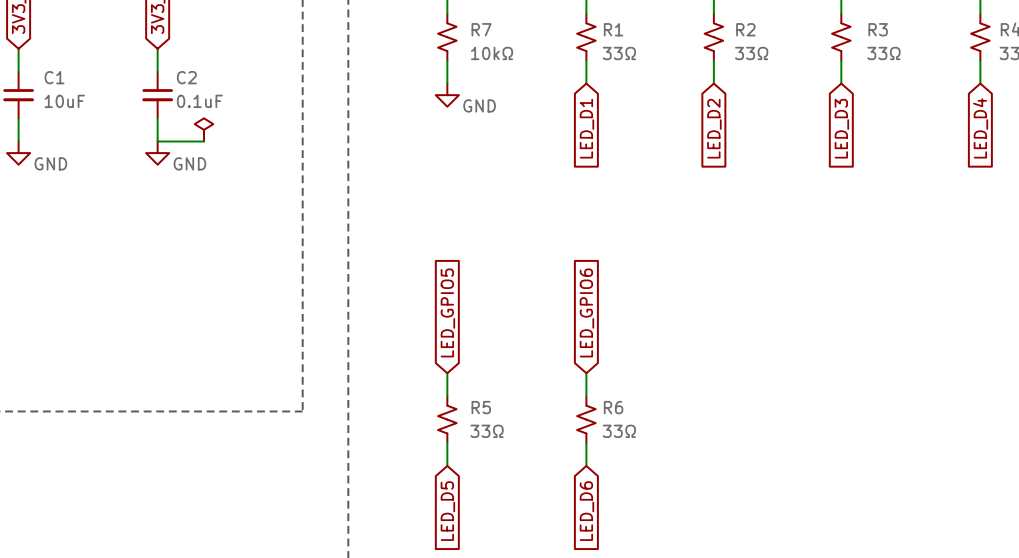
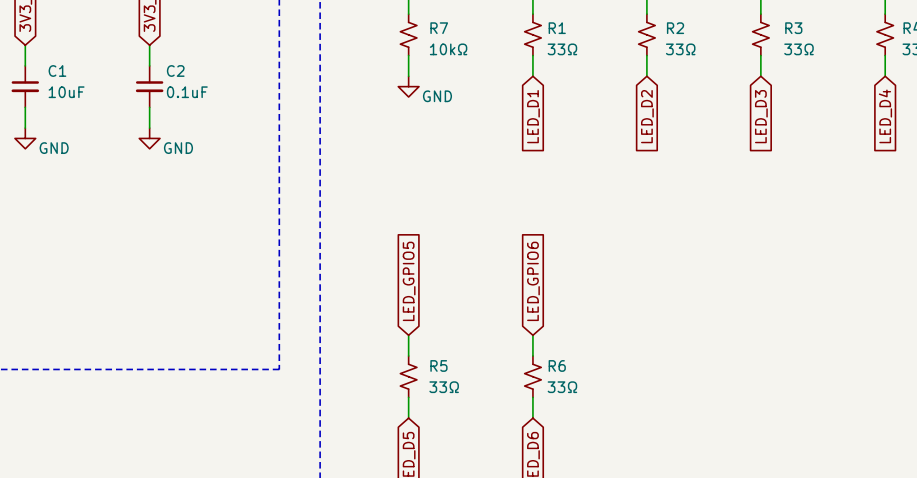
power symbol: (204, 129) -> none
wire: (157, 141) (204, 141) -> none

